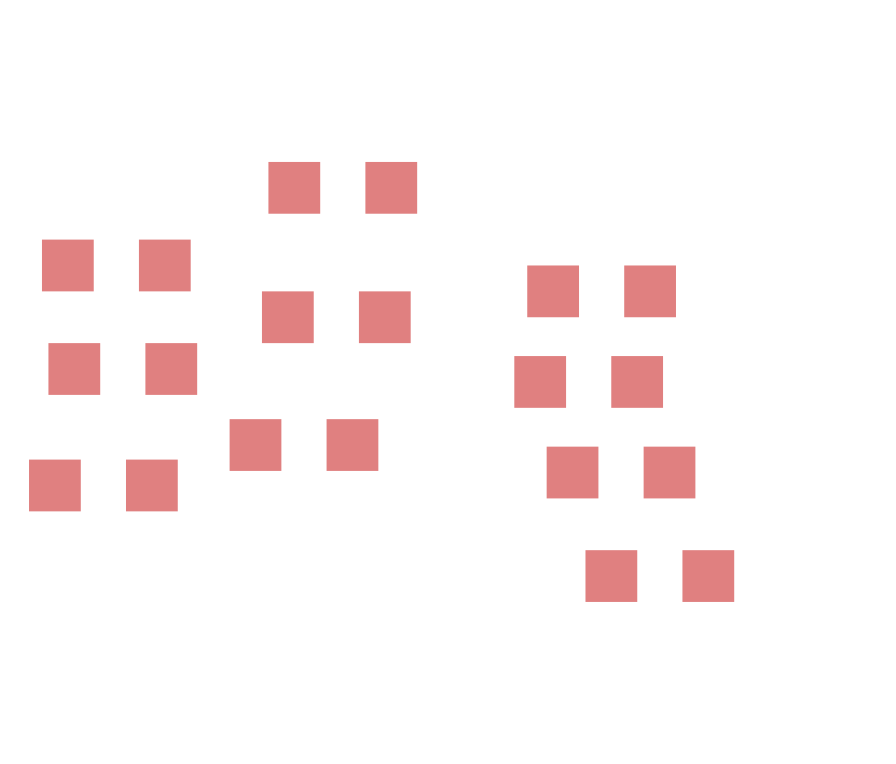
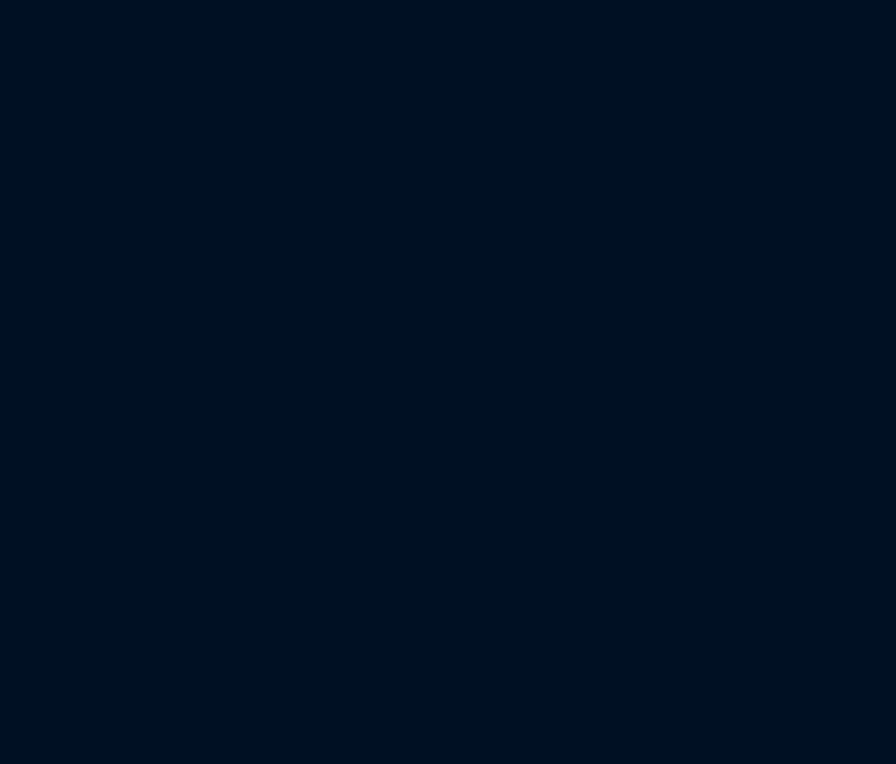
part: (342, 187) -> none
part: (116, 265) -> none
part: (601, 291) -> none
part: (336, 317) -> none
part: (122, 369) -> none
part: (588, 381) -> none
part: (303, 445) -> none
part: (621, 472) -> none
part: (103, 485) -> none
part: (659, 576) -> none

